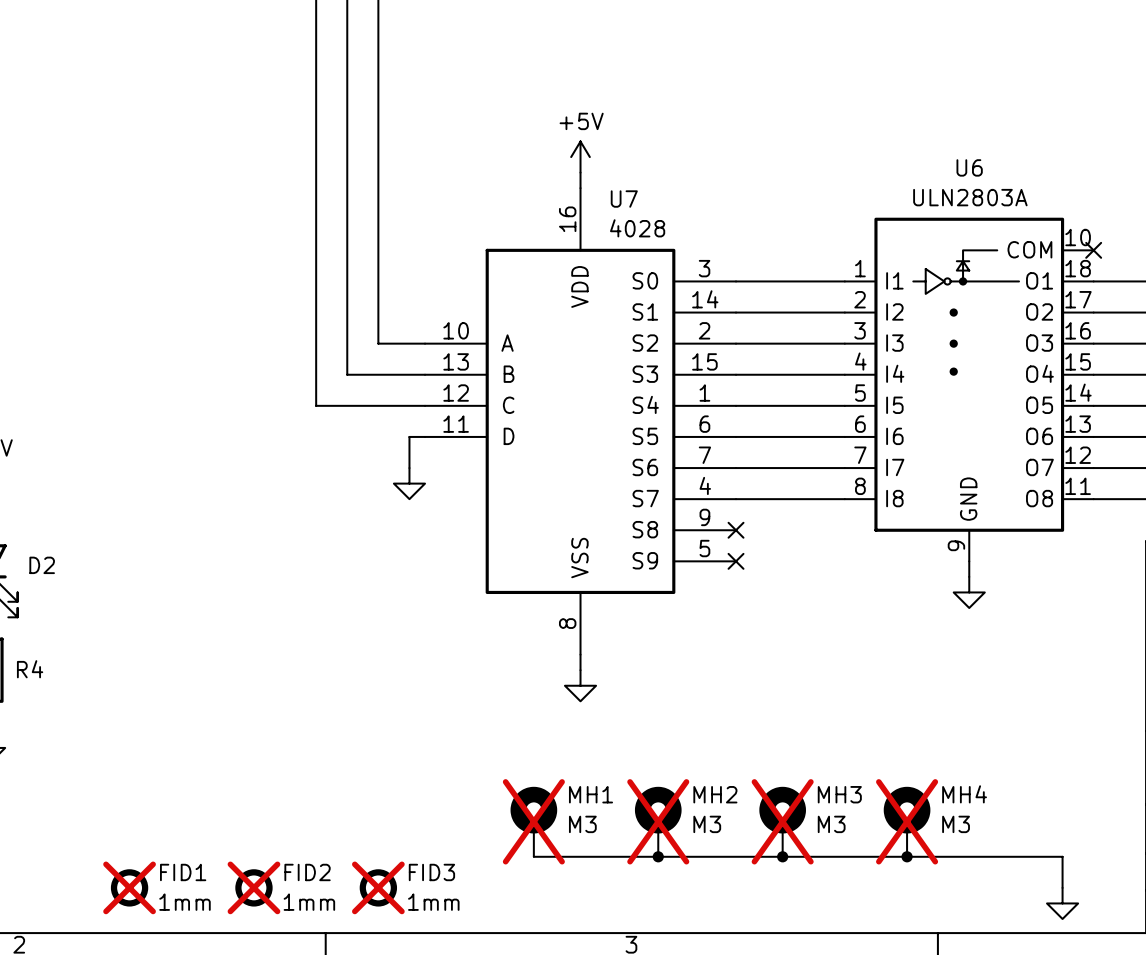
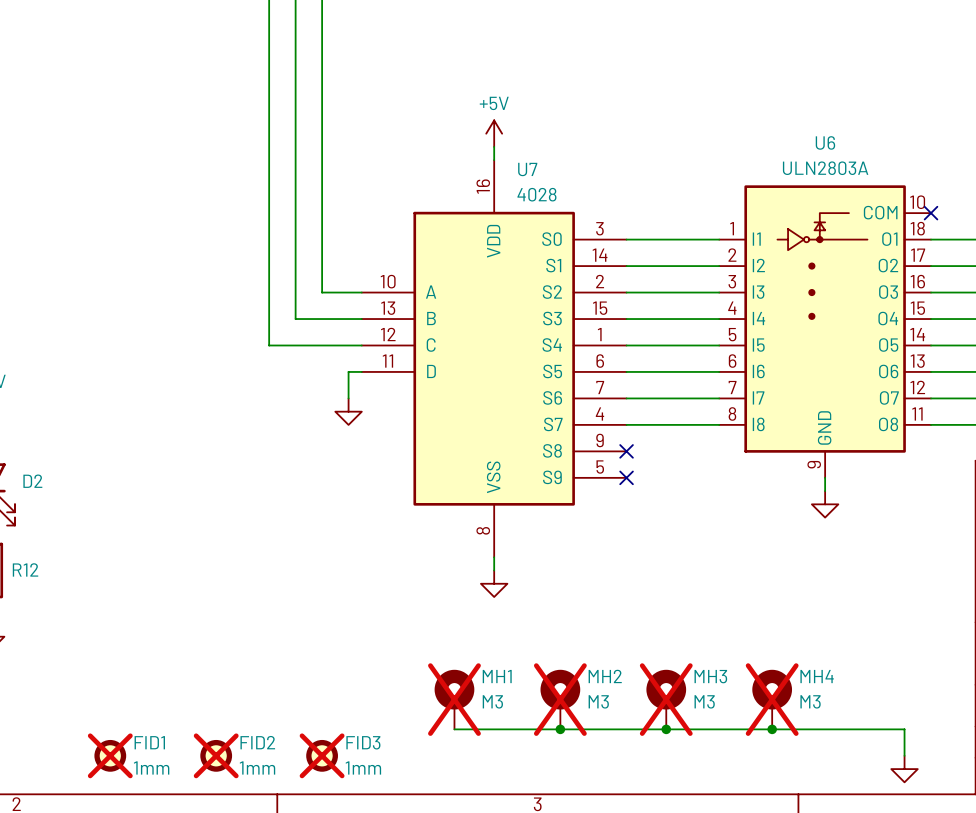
R4 name: R4 (30, 669) -> R12 (25, 569)

